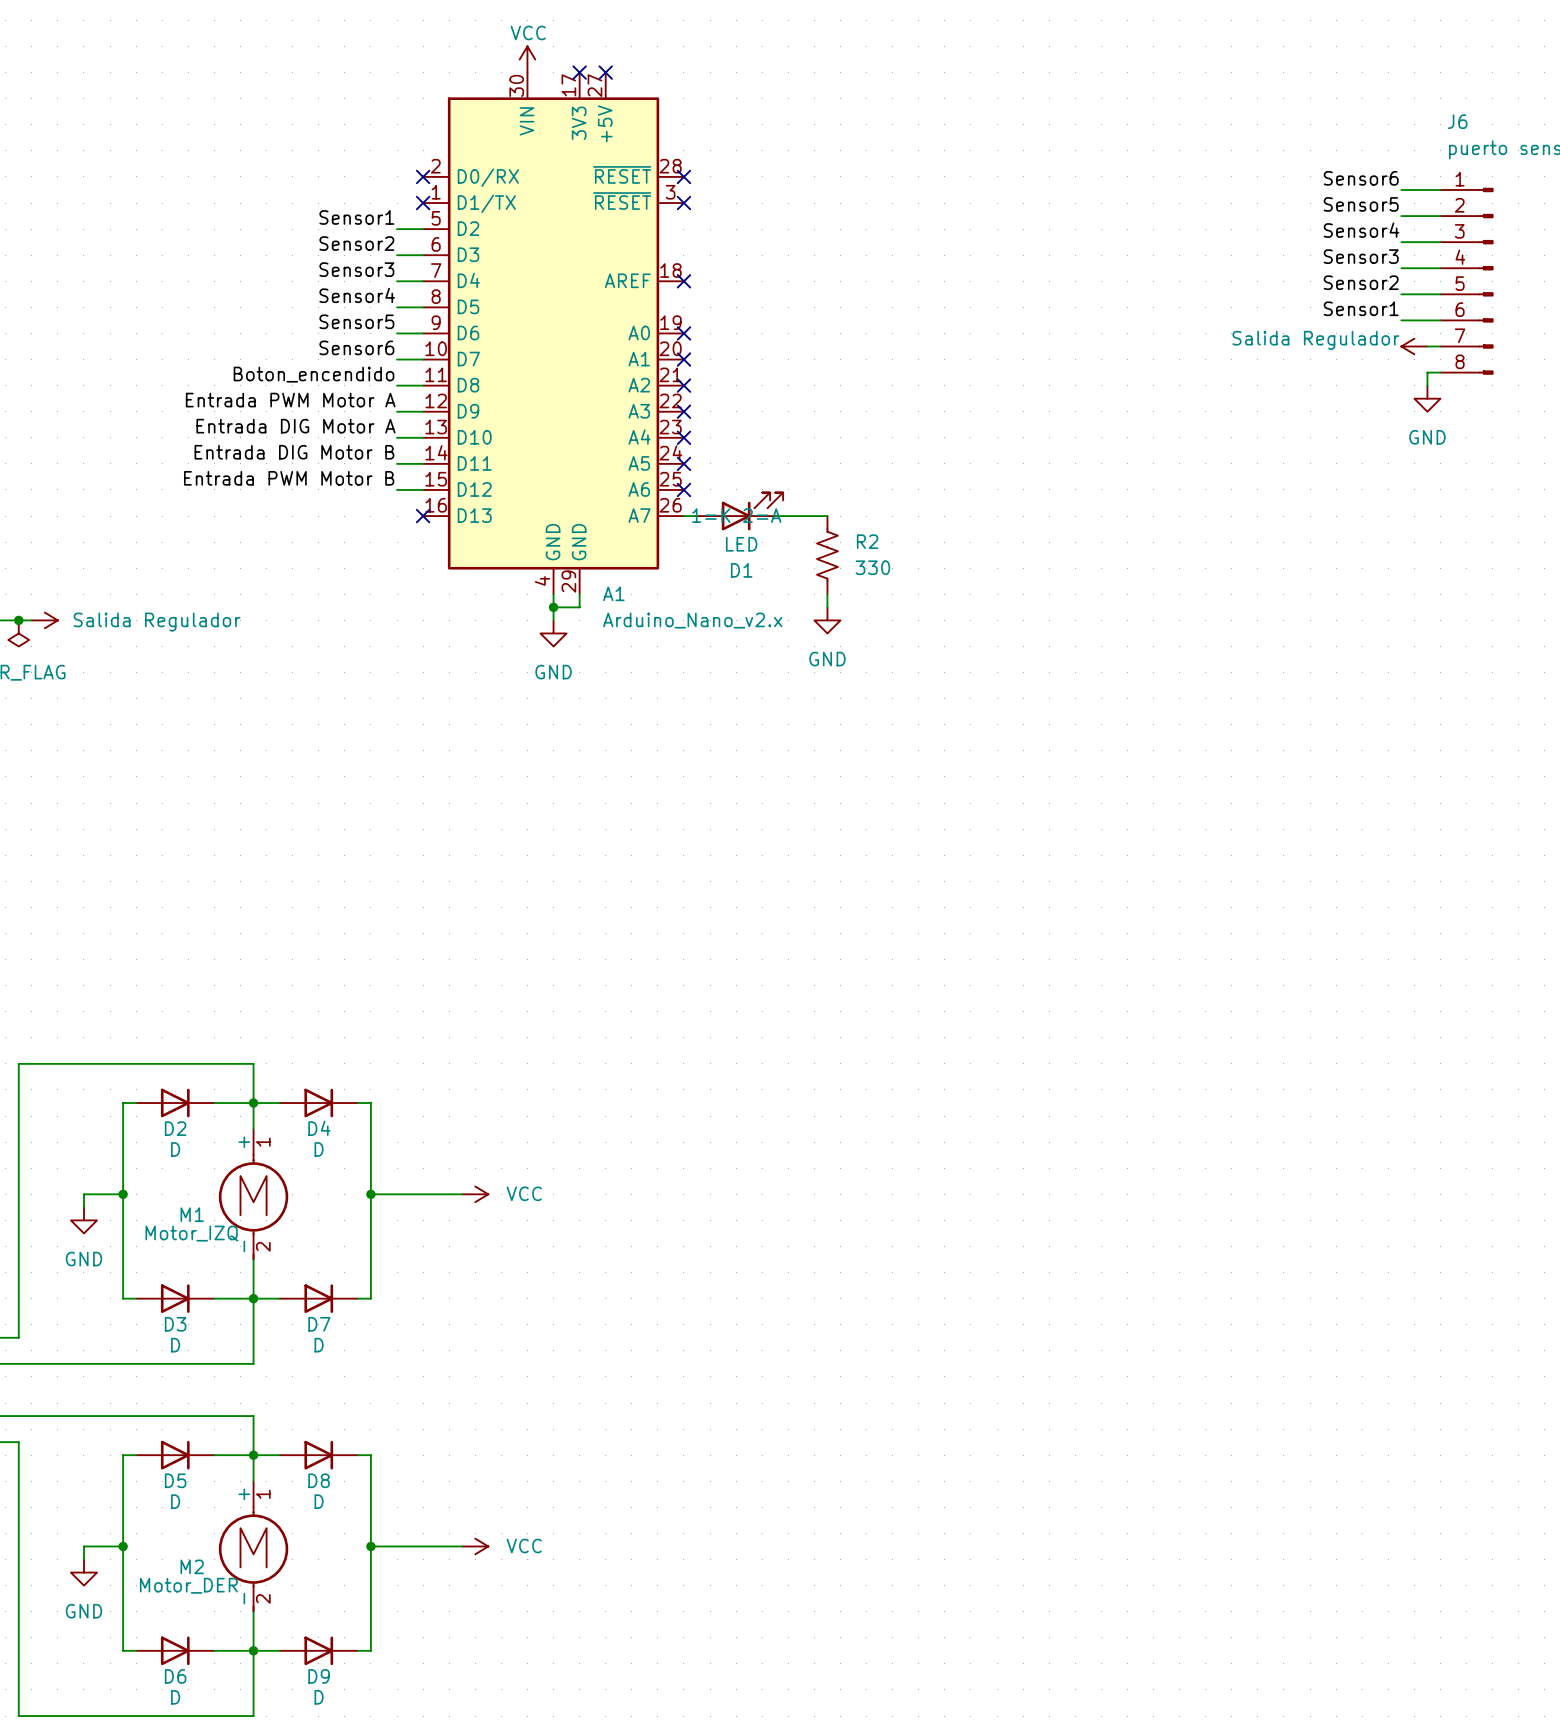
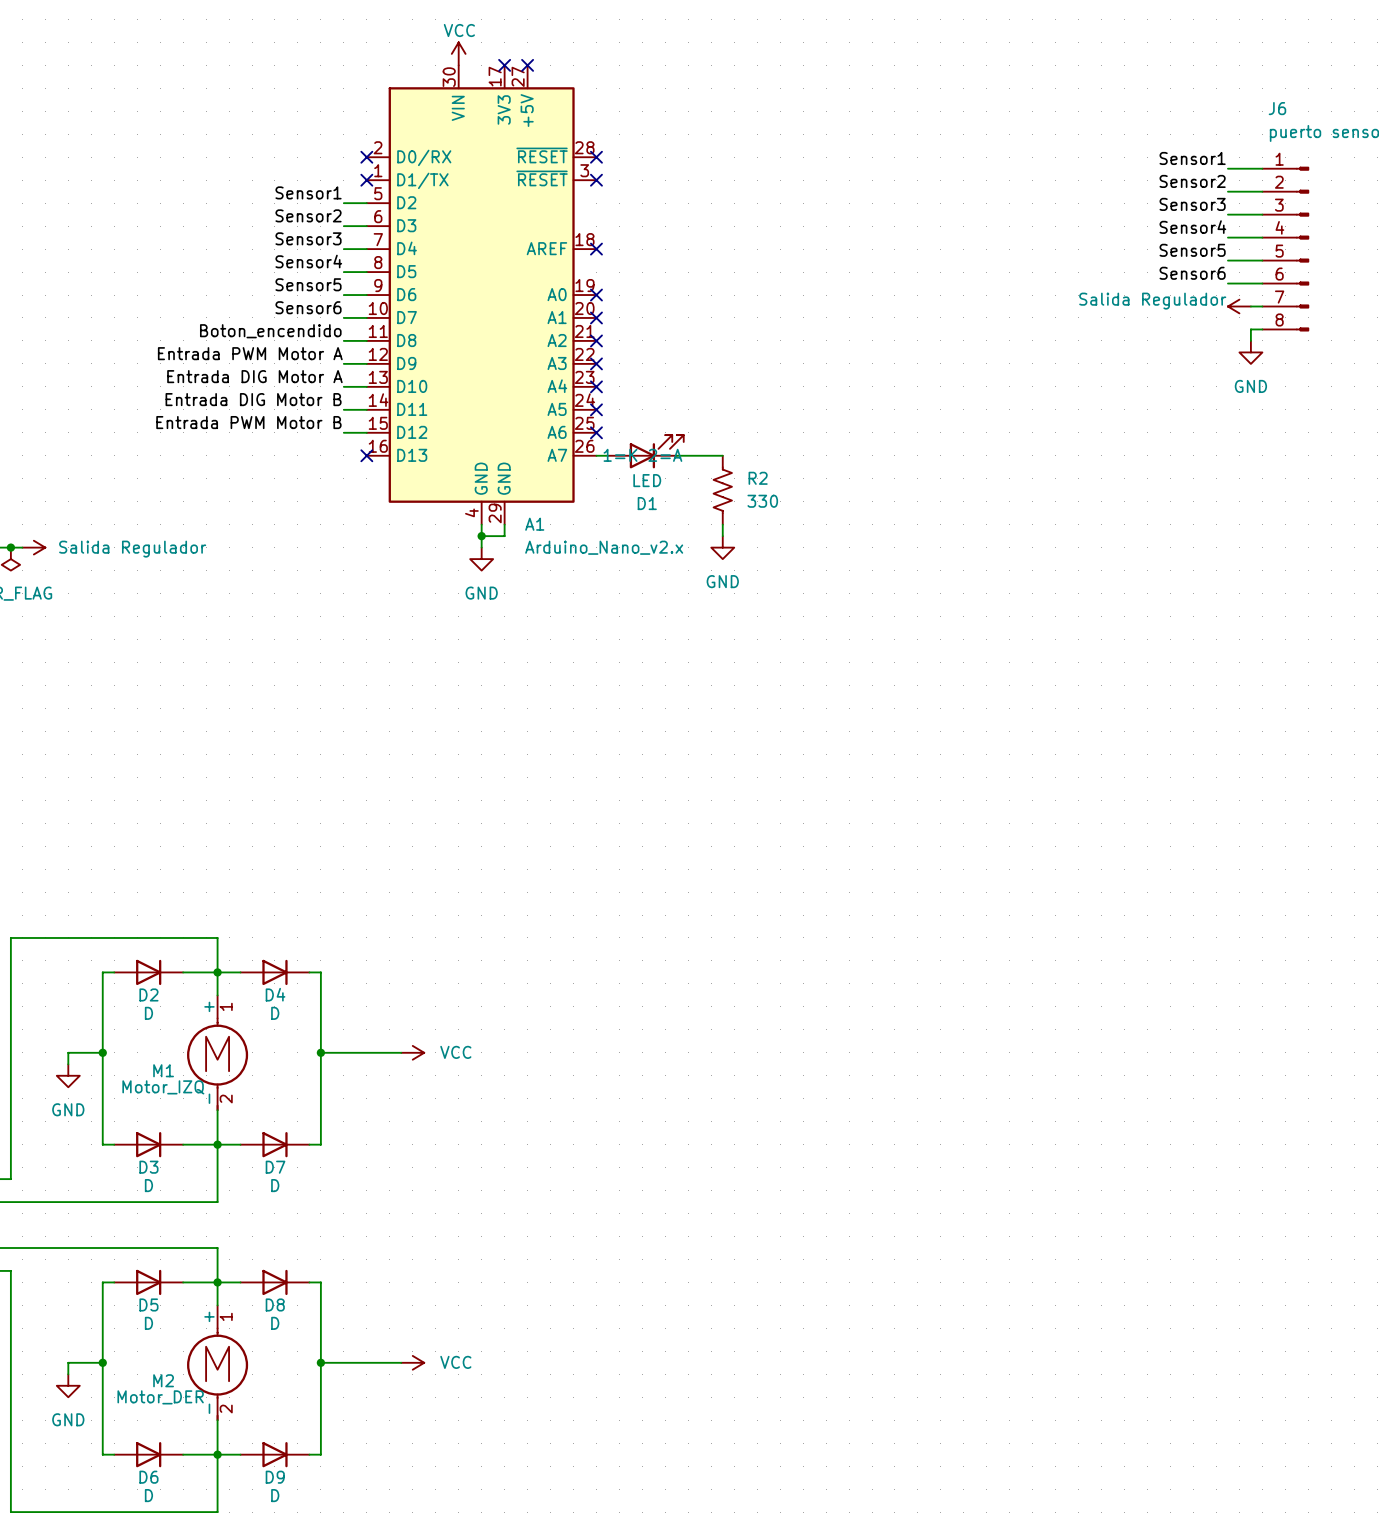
label: Sensor6 (1361, 178) -> Sensor1 (1192, 158)
label: Sensor5 (1361, 204) -> Sensor2 (1192, 181)
label: Sensor4 (1361, 230) -> Sensor3 (1192, 204)
label: Sensor3 (1361, 256) -> Sensor4 (1192, 227)
label: Sensor2 (1361, 282) -> Sensor5 (1192, 250)
label: Sensor1 (1361, 308) -> Sensor6 (1192, 273)

